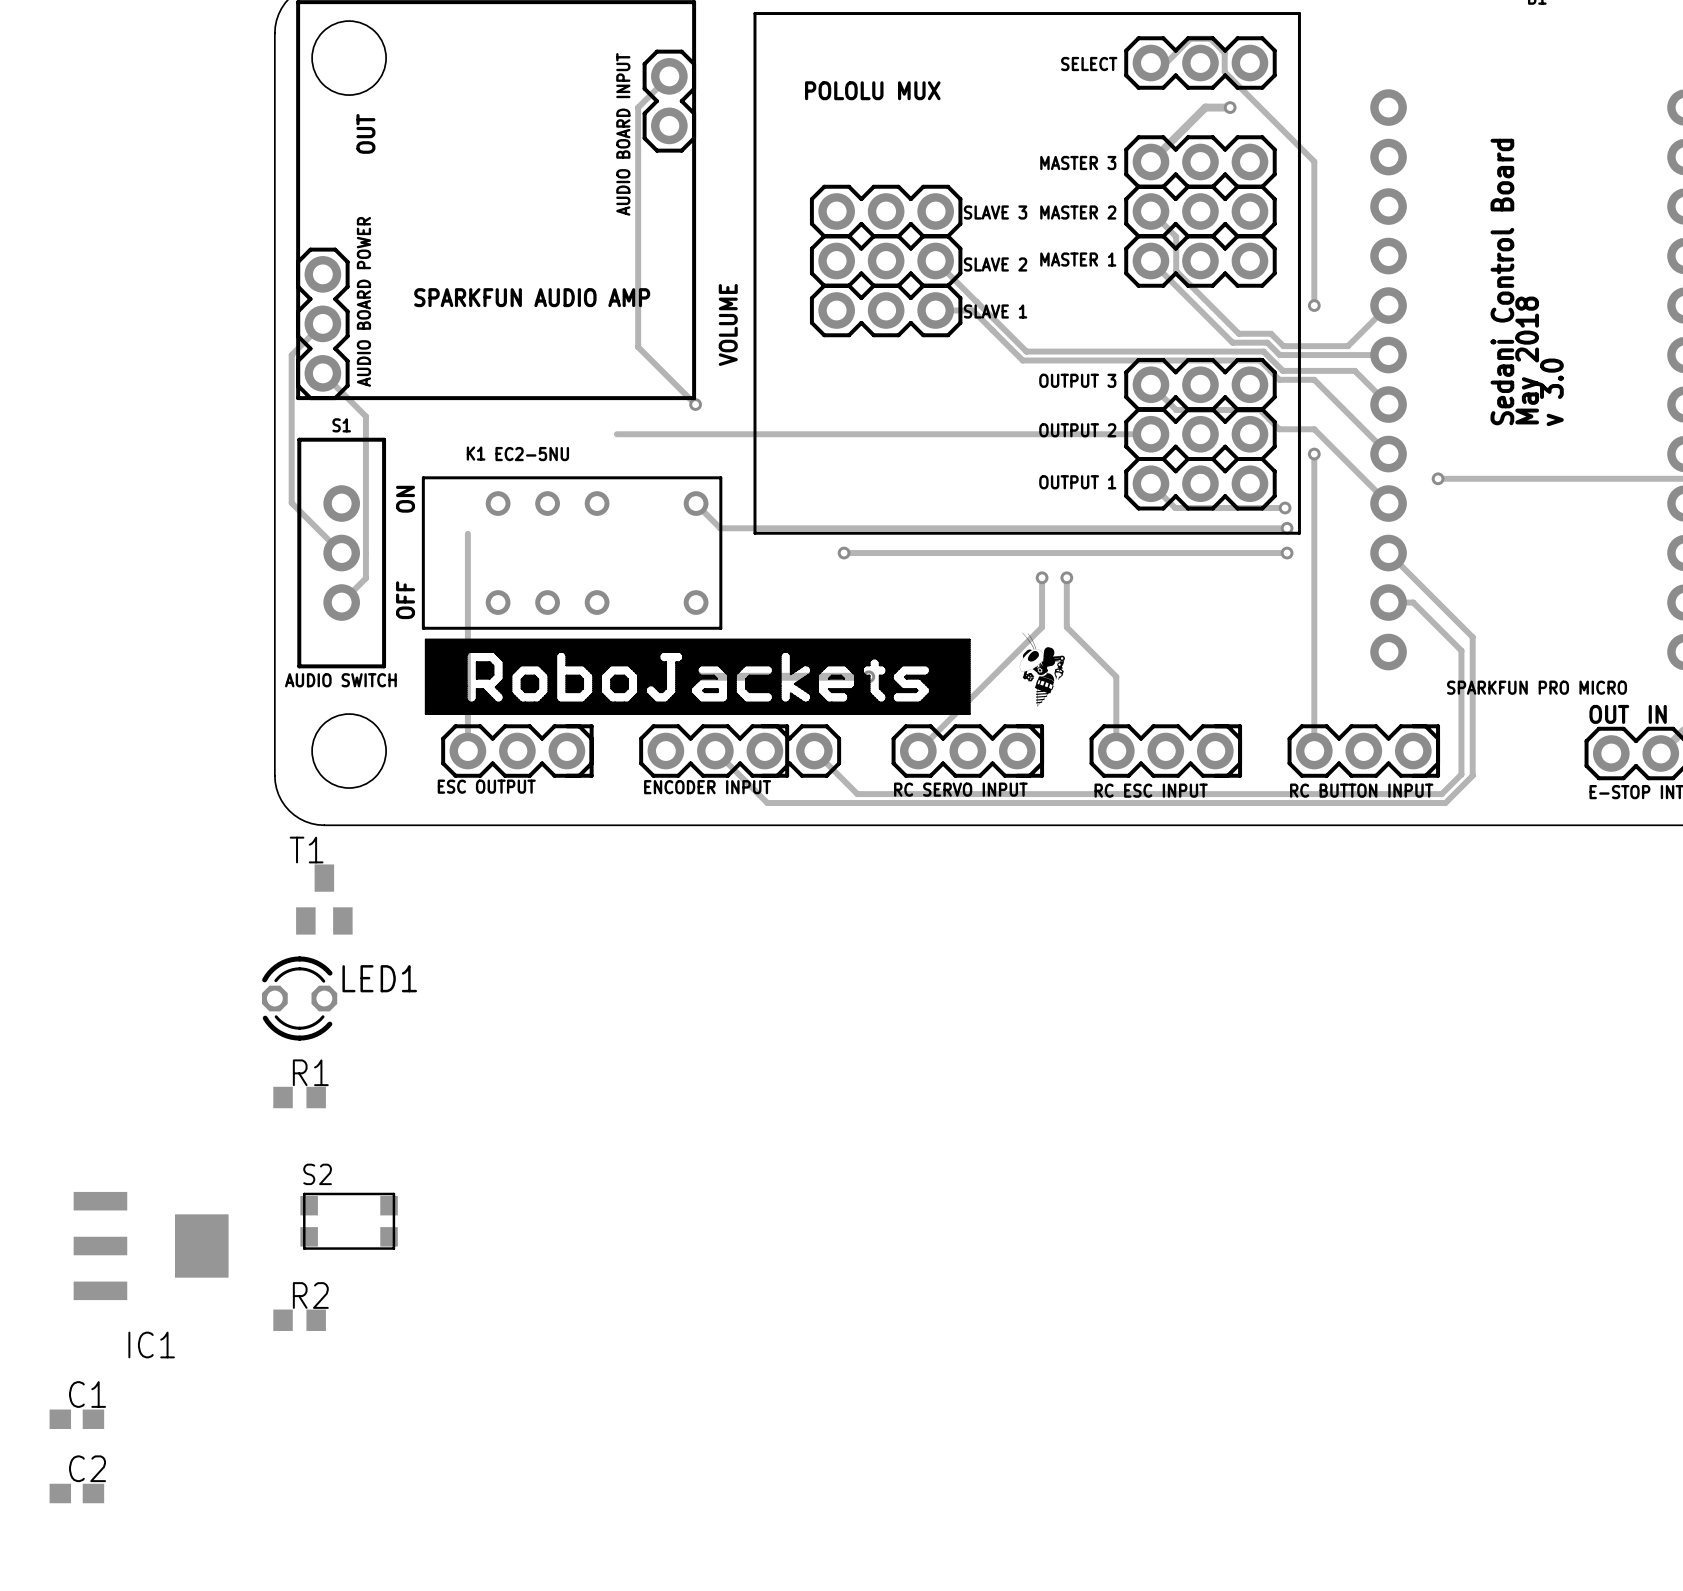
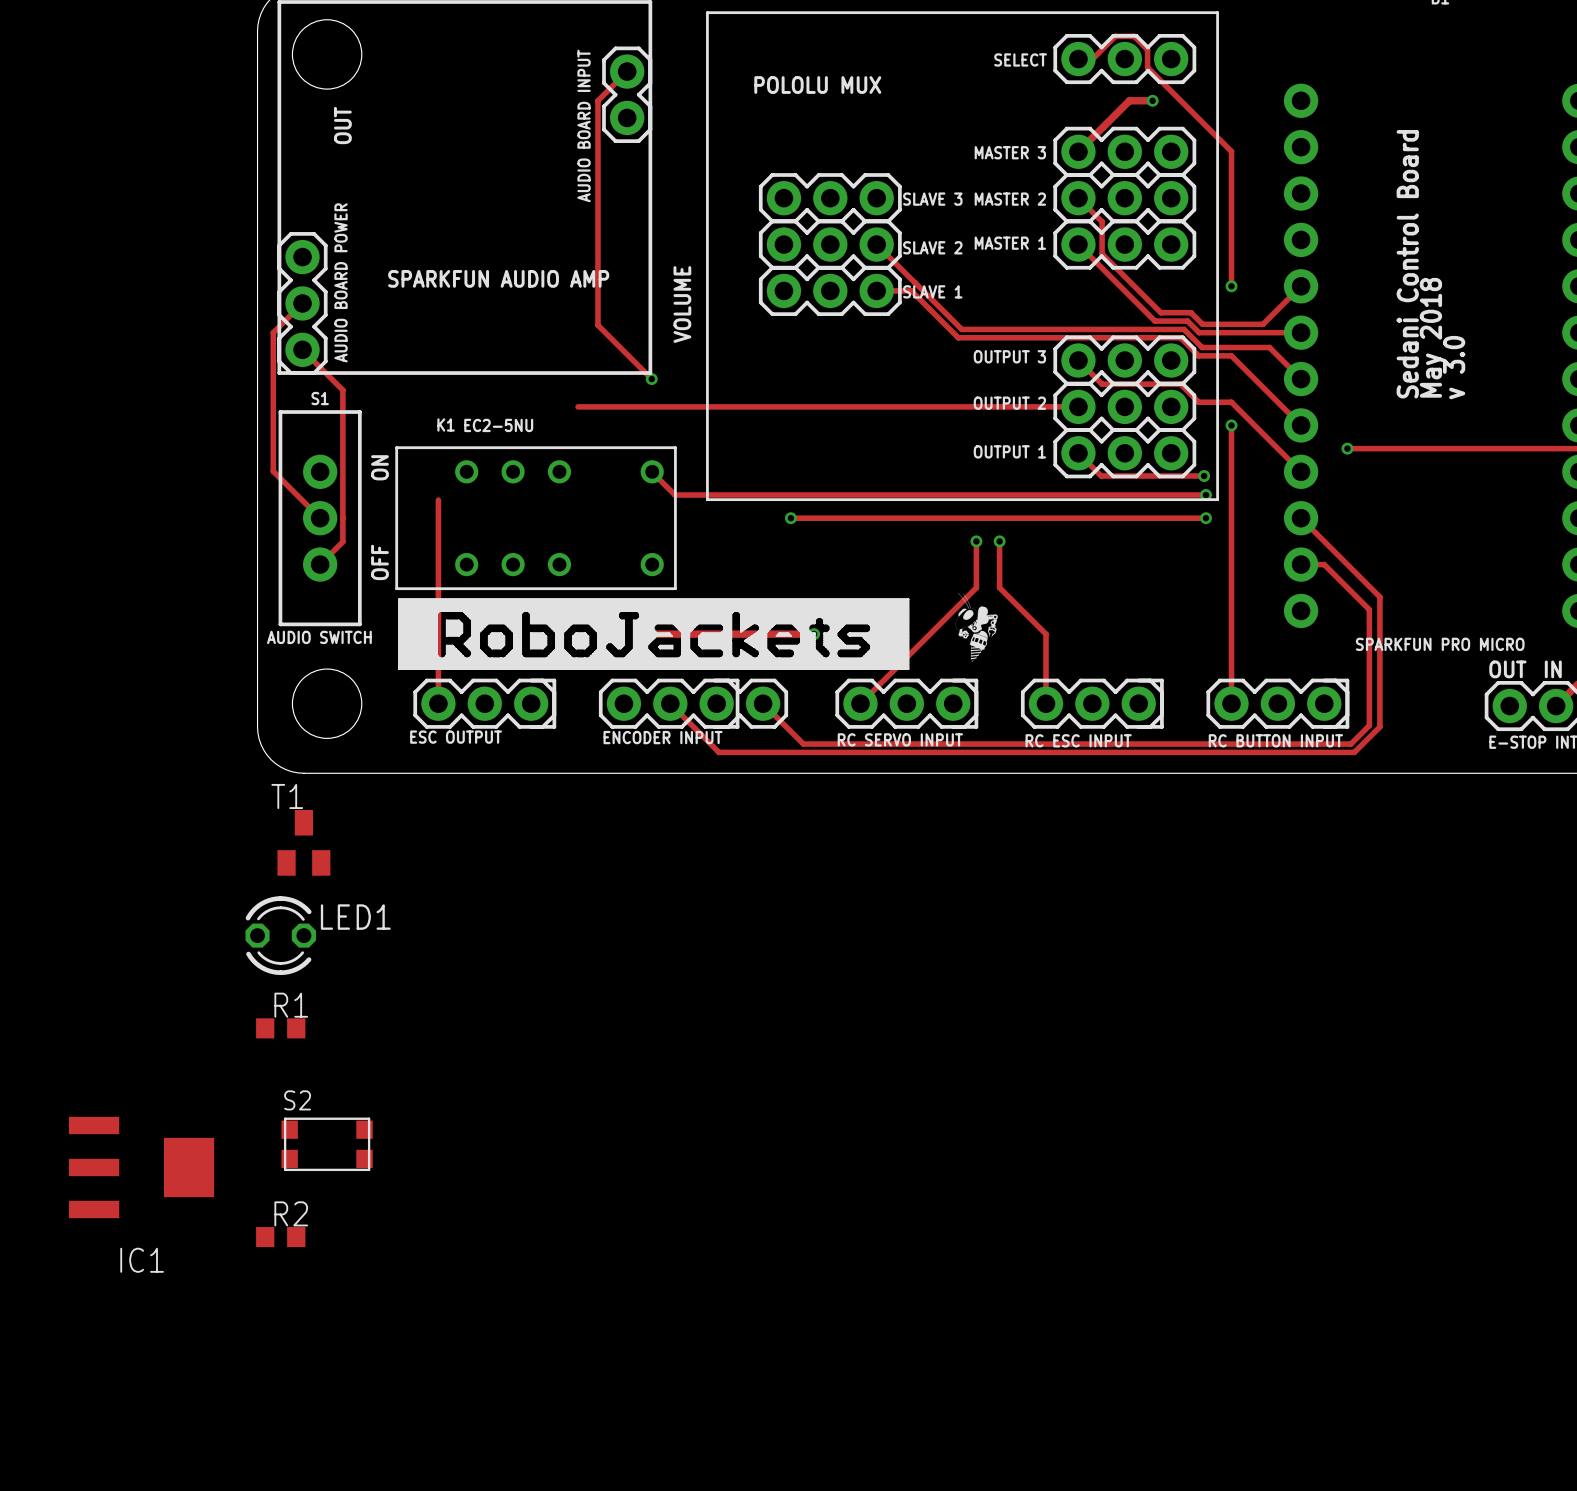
C1: (76, 1419) -> none
C2: (76, 1493) -> none

